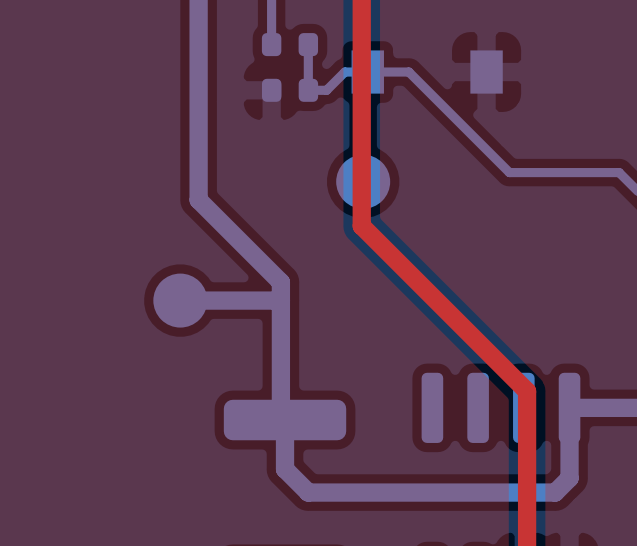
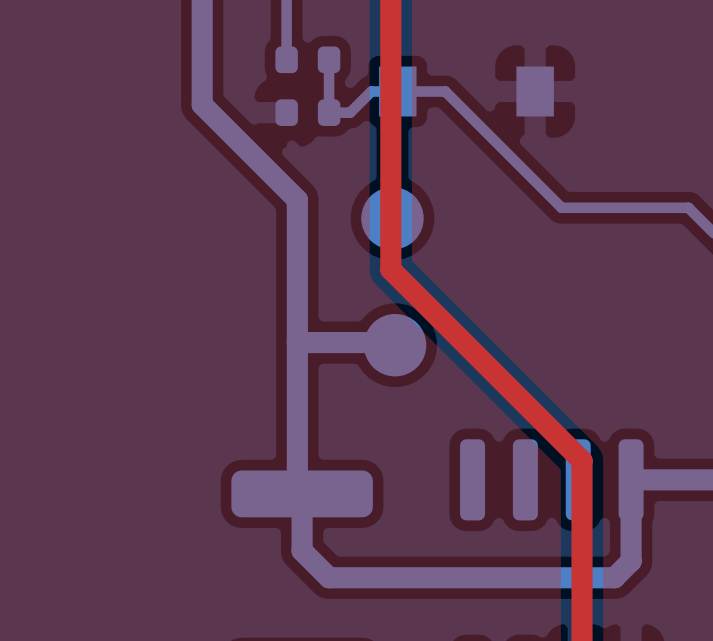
bottom track: (198, 83) (198, 200) (280, 282) -> (202, 104) (297, 199) (297, 334)
bottom track: none -> (297, 342) (392, 342) (395, 345)
bottom track: (180, 300) (280, 300) -> none
part position: (180, 300) -> (395, 345)

